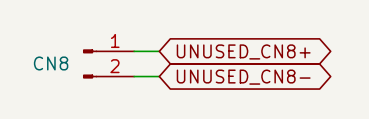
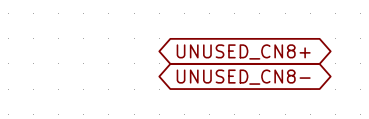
wire: (134, 51) (159, 51) -> none
CN8: (108, 63) -> none
wire: (134, 76) (159, 76) -> none

